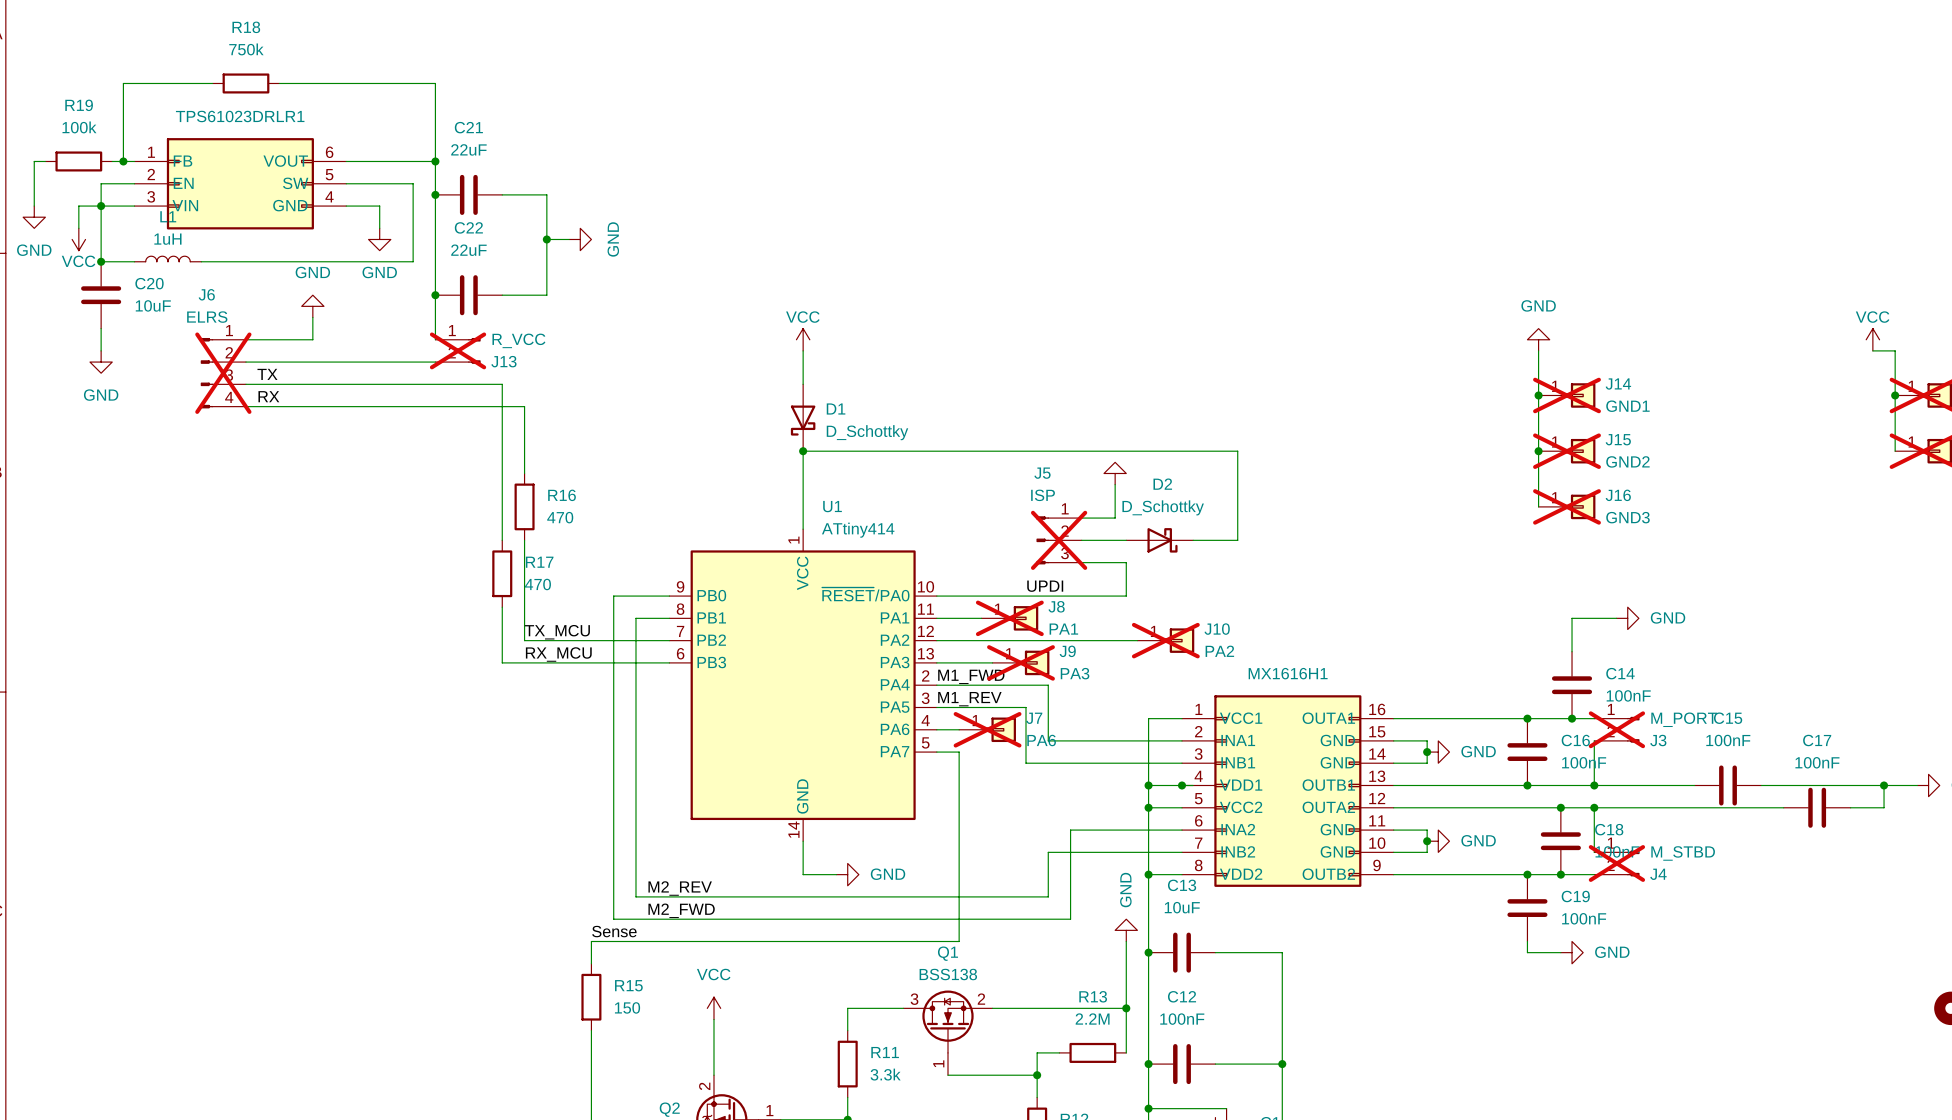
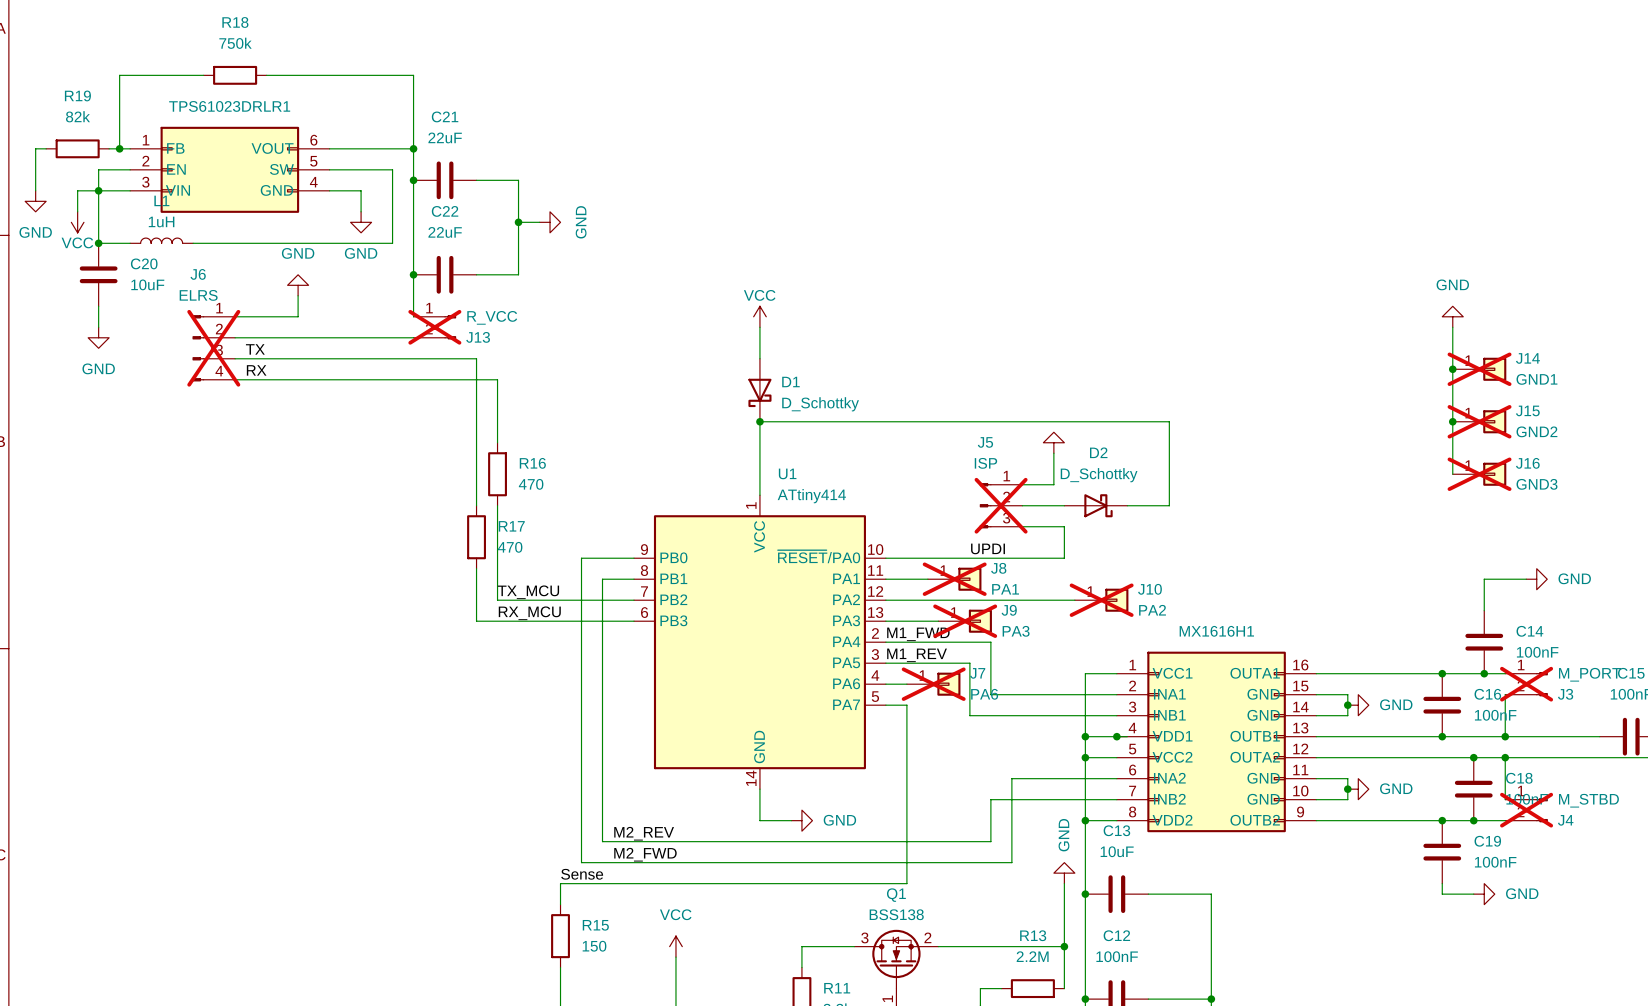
R19 value: 100k (79, 127) -> 82k (77, 116)

